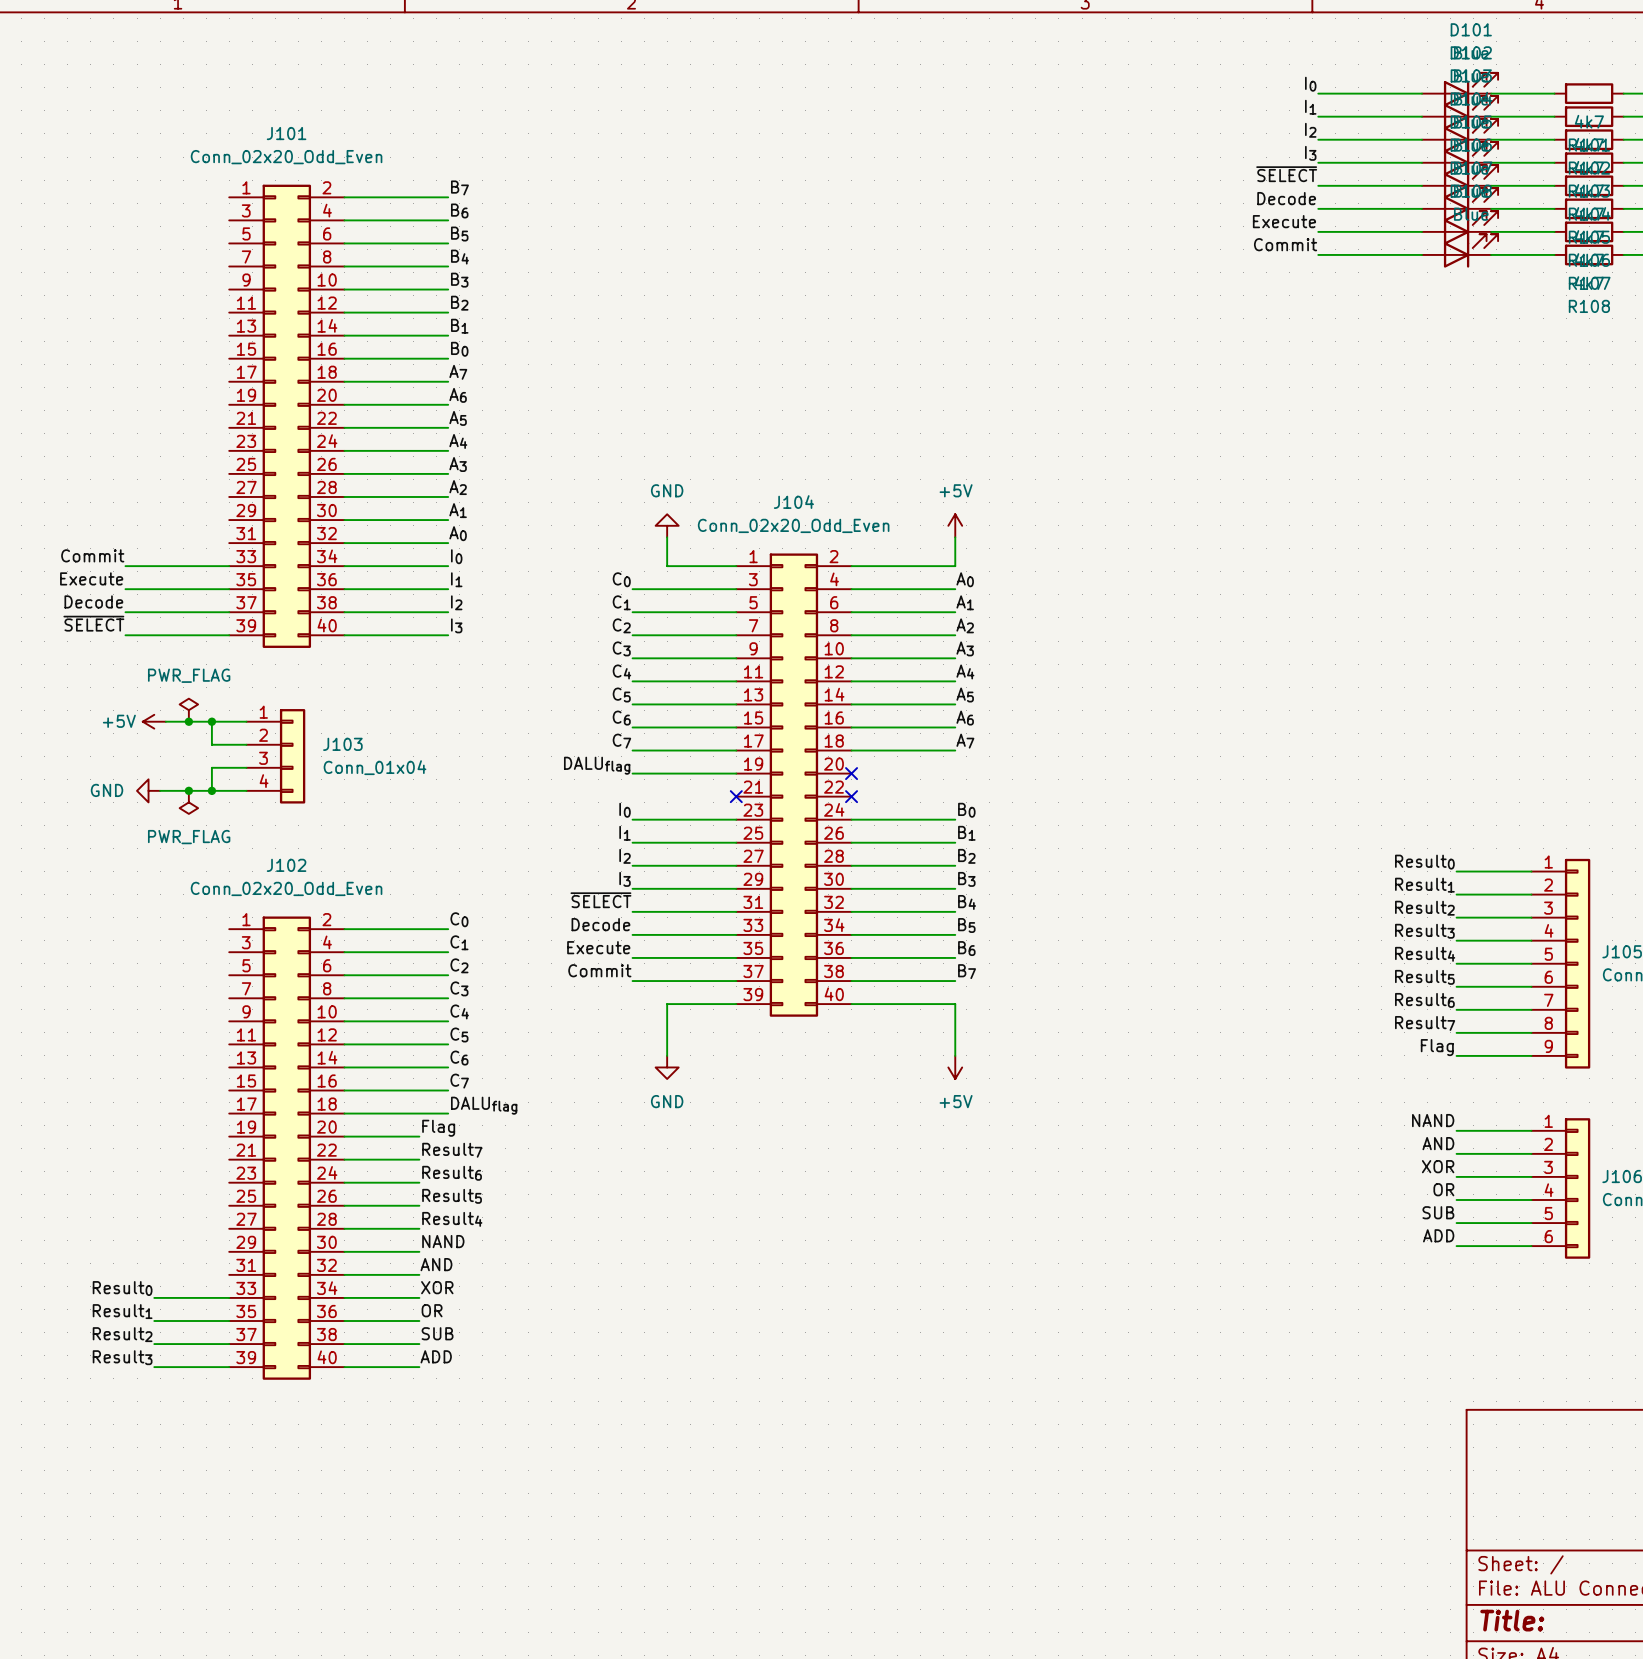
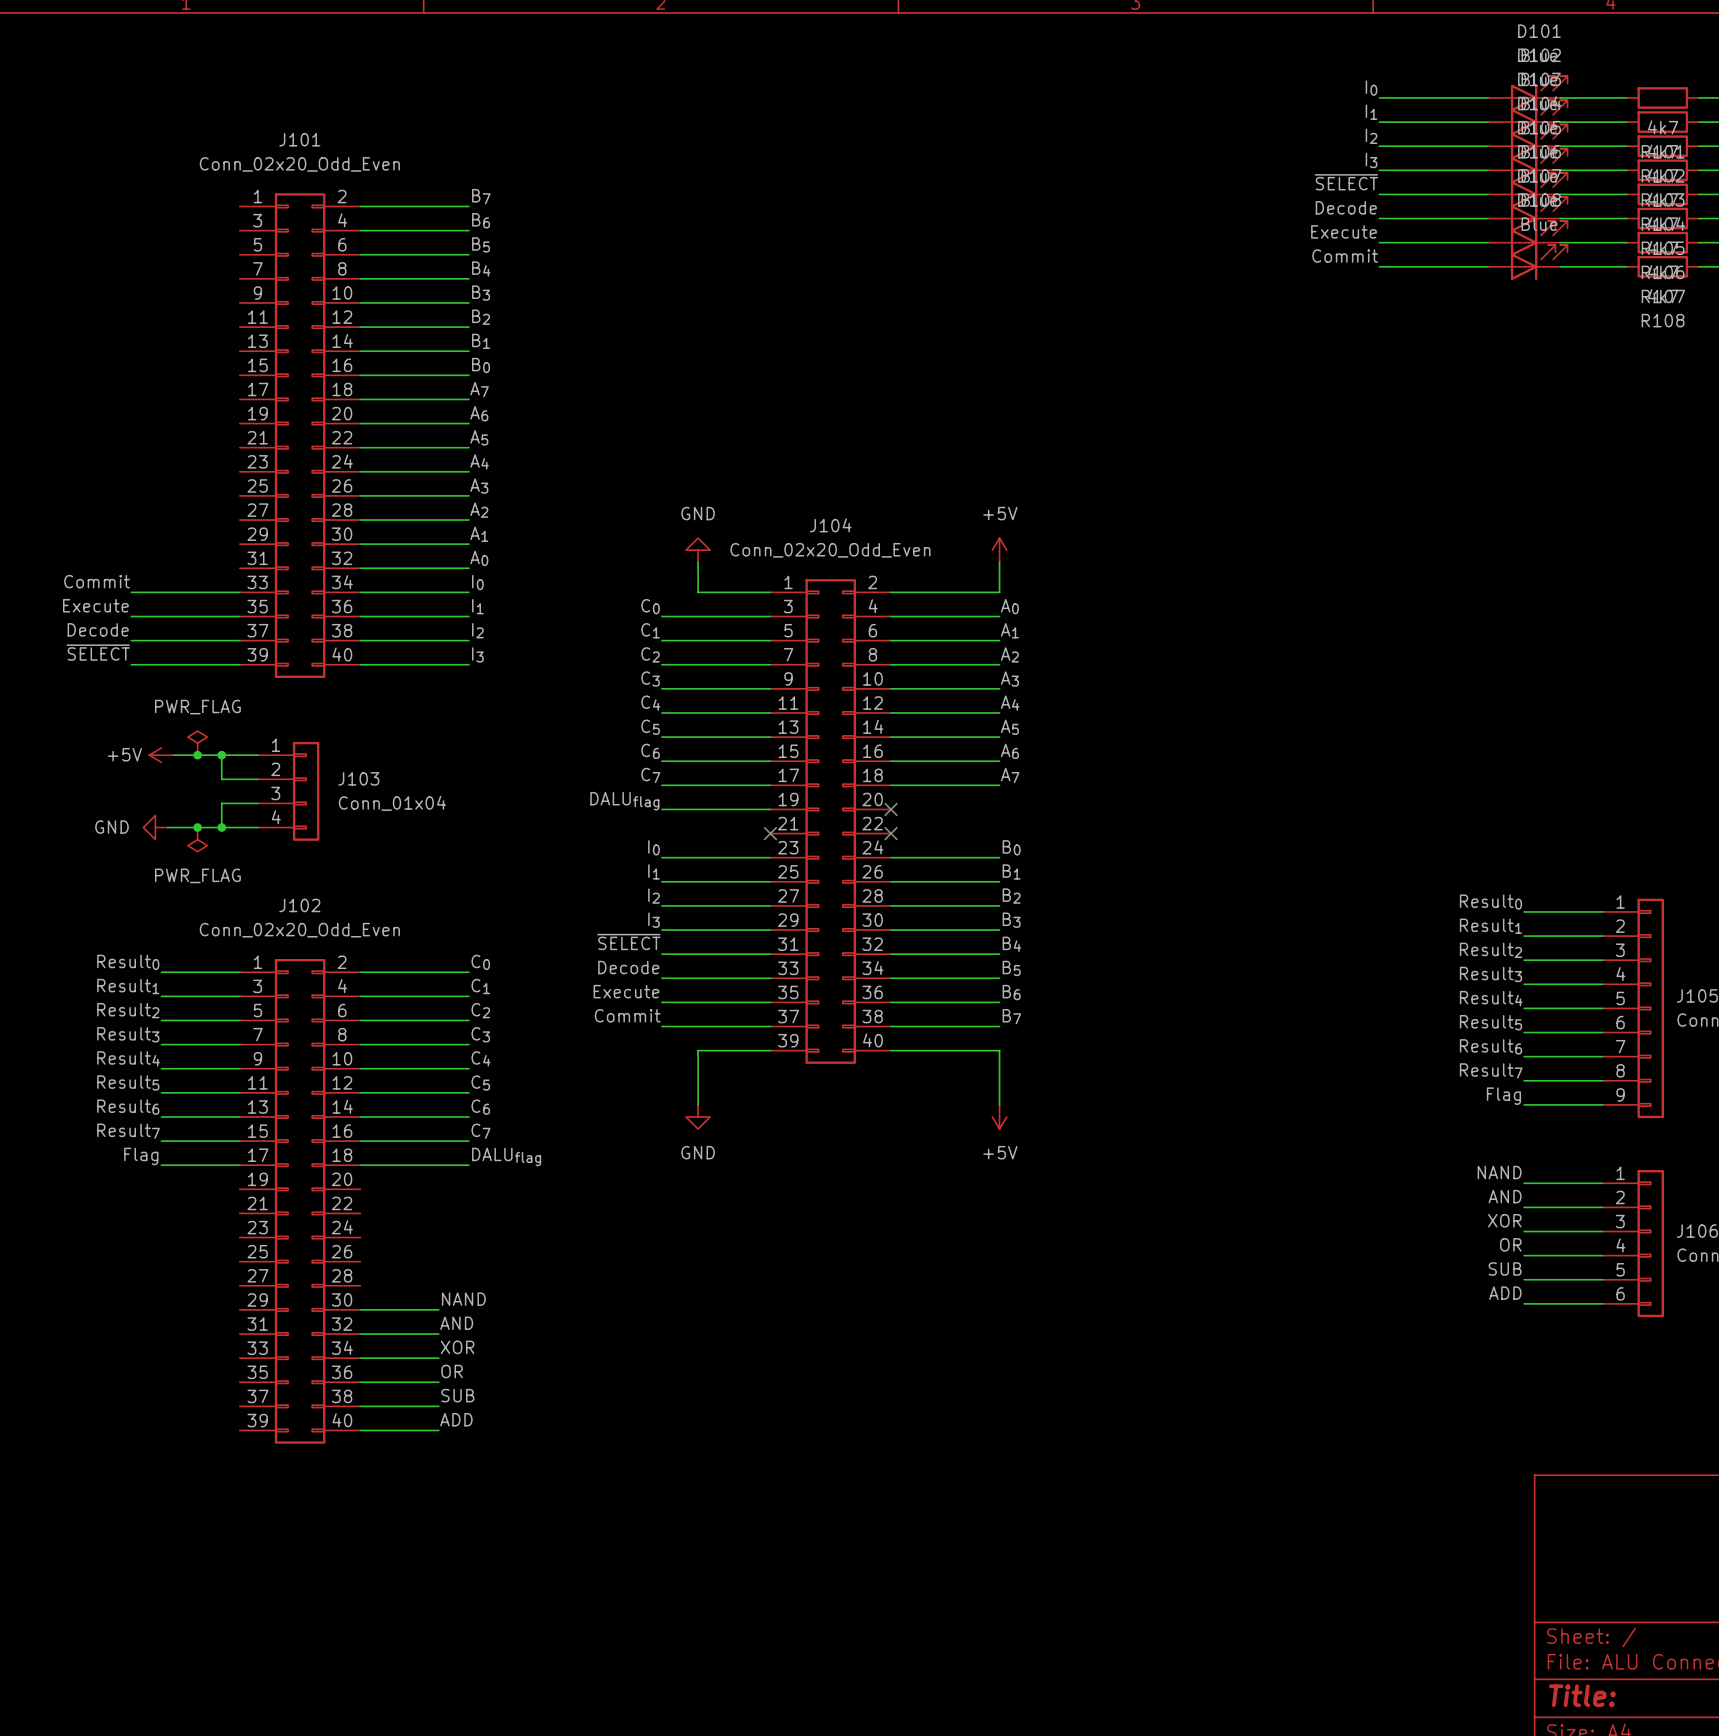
label: none -> Result0 (128, 962)
wire: none -> (161, 972) (239, 972)
label: none -> Result1 (128, 986)
wire: none -> (161, 996) (239, 996)
label: none -> Result2 (128, 1010)
wire: none -> (161, 1020) (239, 1020)
label: none -> Result3 (128, 1034)
wire: none -> (161, 1044) (239, 1044)
label: none -> Result4 (128, 1058)
label: none -> Result5 (128, 1082)
label: none -> Result6 (128, 1107)
label: none -> Result7 (128, 1131)
label: none -> Flag (141, 1156)
label: Flag (438, 1128) -> none
wire: (344, 1136) (419, 1136) -> (161, 1068) (239, 1068)
label: Result7 (452, 1150) -> none
wire: (344, 1159) (419, 1159) -> (161, 1092) (239, 1092)
label: Result6 (452, 1173) -> none
wire: (344, 1182) (419, 1182) -> (161, 1116) (239, 1116)
label: Result5 (452, 1196) -> none
wire: (344, 1205) (419, 1205) -> (161, 1141) (239, 1141)
label: Result4 (452, 1219) -> none
wire: (344, 1228) (419, 1228) -> (161, 1165) (239, 1165)
label: Result0 (122, 1288) -> none
wire: (154, 1297) (229, 1297) -> none
label: Result1 (122, 1311) -> none
wire: (154, 1321) (229, 1321) -> none
label: Result2 (122, 1334) -> none
wire: (154, 1344) (229, 1344) -> none
label: Result3 (122, 1357) -> none
wire: (154, 1367) (229, 1367) -> none

